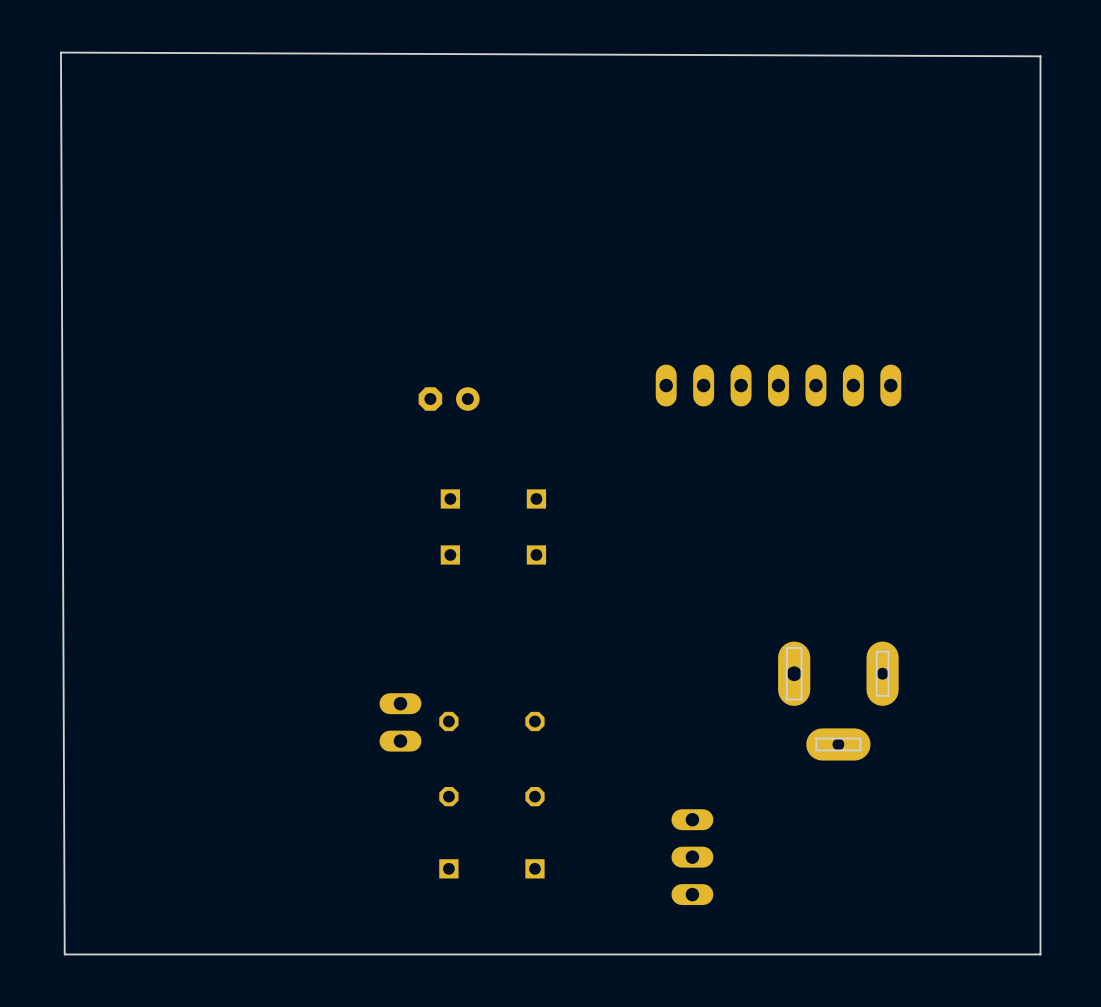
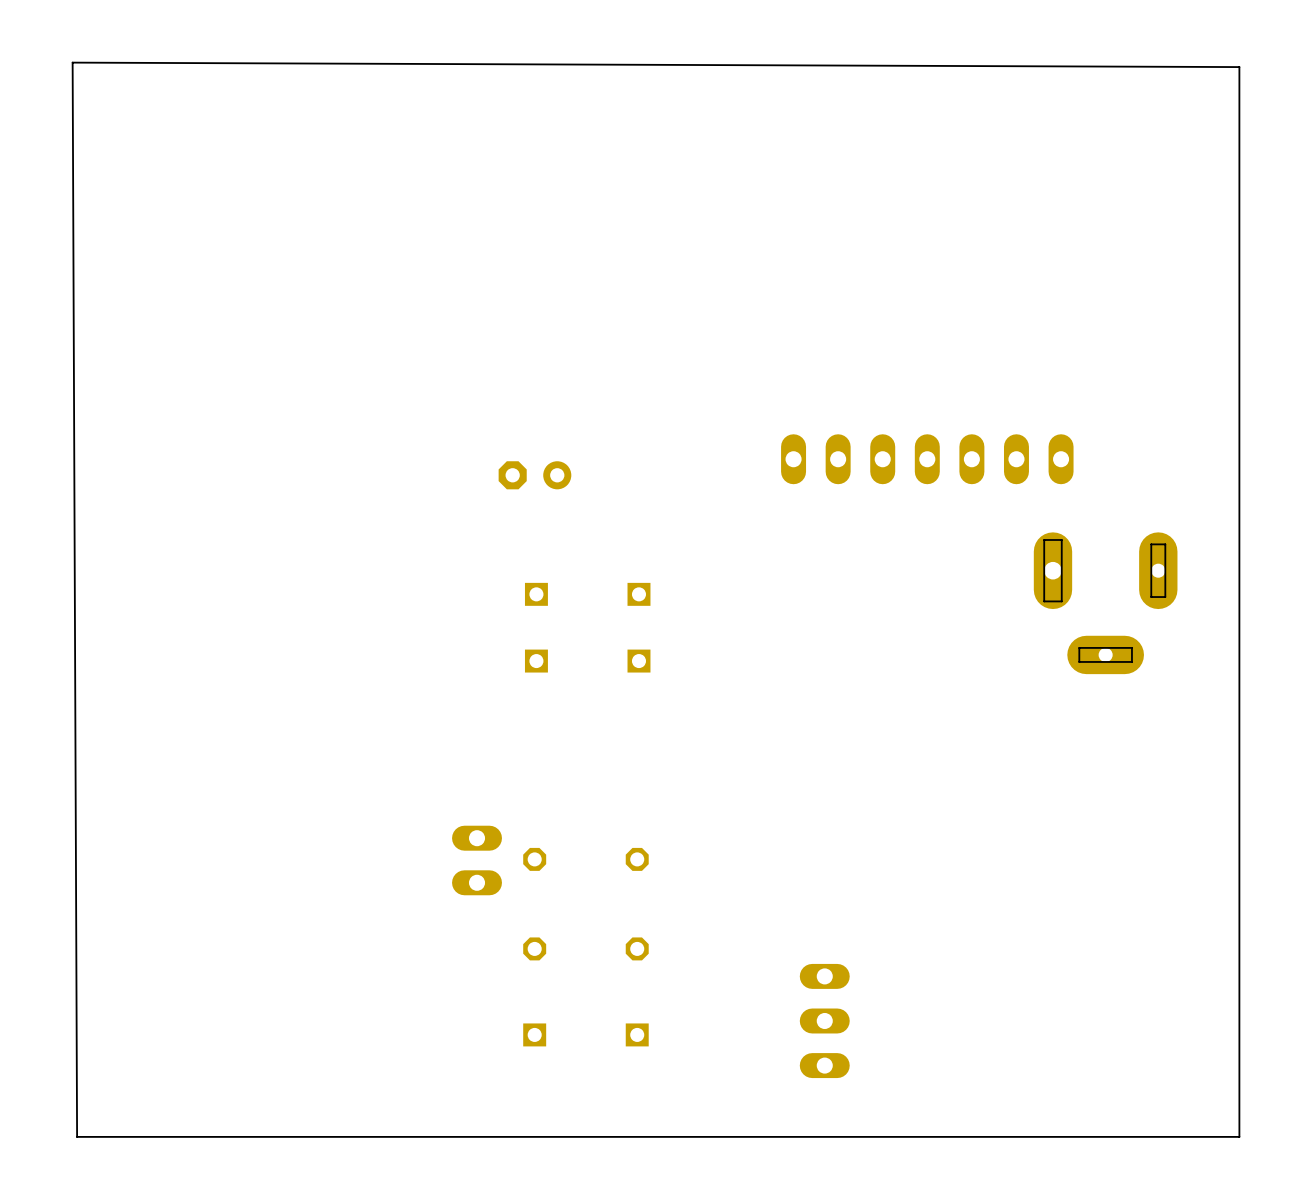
part position: (838, 701) -> (1105, 603)

